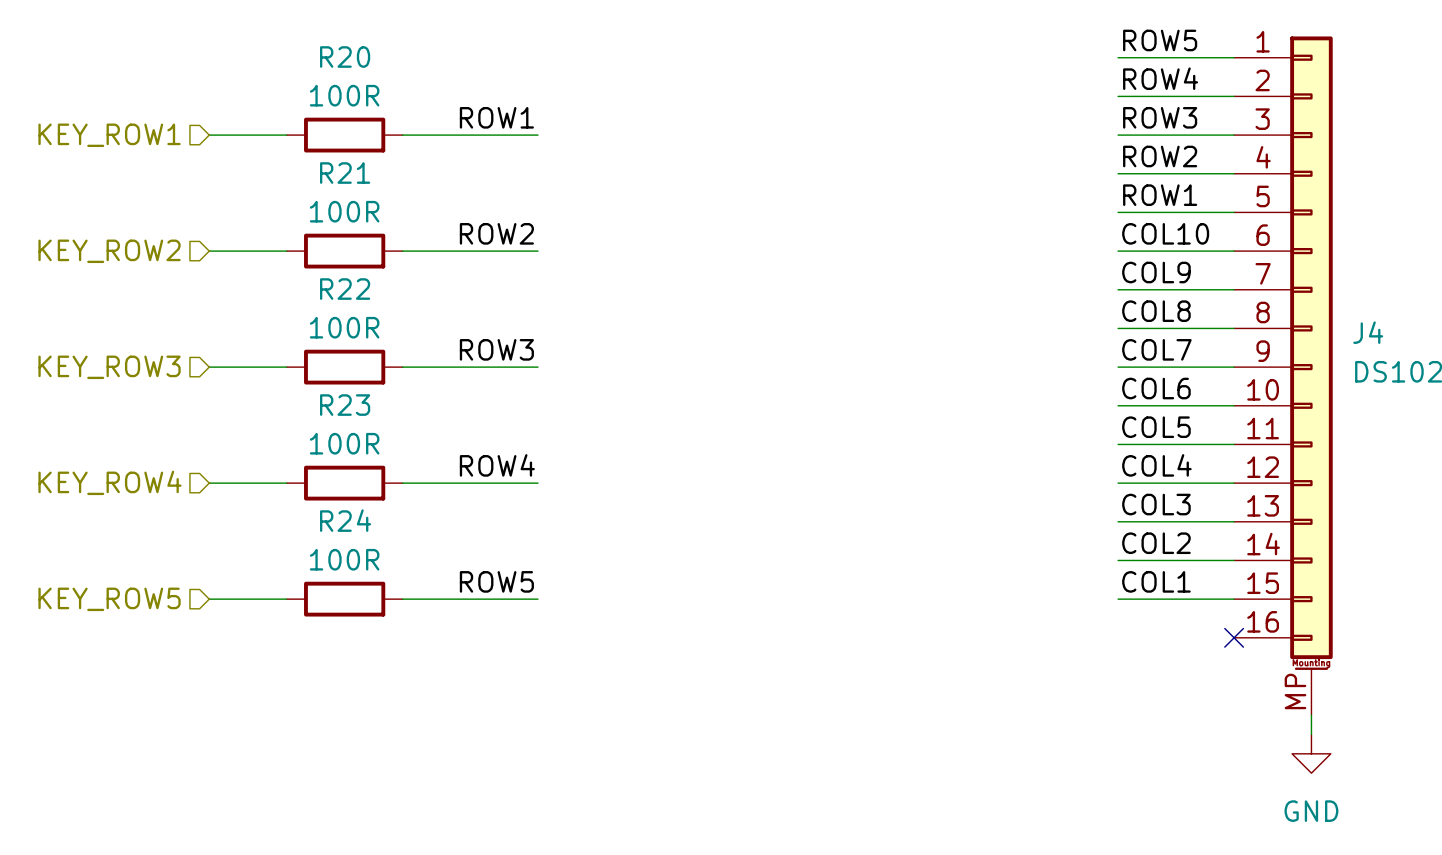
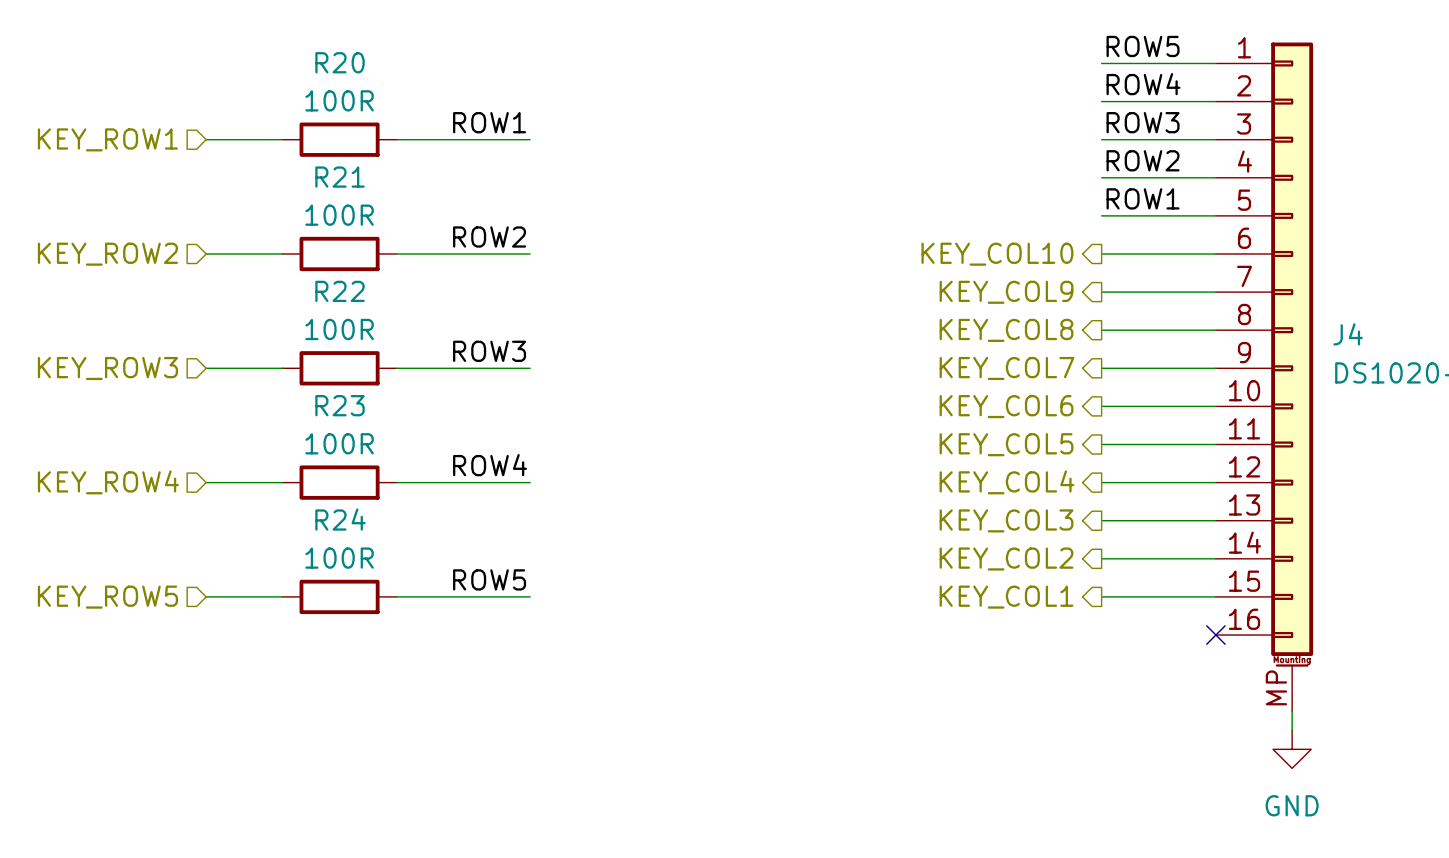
label: COL10 (1165, 233) -> none
hierarchical label: none -> KEY_COL10 (997, 254)
label: COL9 (1156, 272) -> none
hierarchical label: none -> KEY_COL9 (1006, 292)
label: COL8 (1156, 311) -> none
hierarchical label: none -> KEY_COL8 (1006, 330)
label: COL7 (1156, 349) -> none
hierarchical label: none -> KEY_COL7 (1006, 368)
label: COL6 (1156, 388) -> none
hierarchical label: none -> KEY_COL6 (1006, 406)
label: COL5 (1156, 427) -> none
hierarchical label: none -> KEY_COL5 (1006, 444)
label: COL4 (1156, 465) -> none
hierarchical label: none -> KEY_COL4 (1006, 482)
label: COL3 (1156, 504) -> none
hierarchical label: none -> KEY_COL3 (1006, 520)
label: COL2 (1156, 543) -> none
hierarchical label: none -> KEY_COL2 (1006, 559)
label: COL1 (1156, 581) -> none
hierarchical label: none -> KEY_COL1 (1006, 597)

